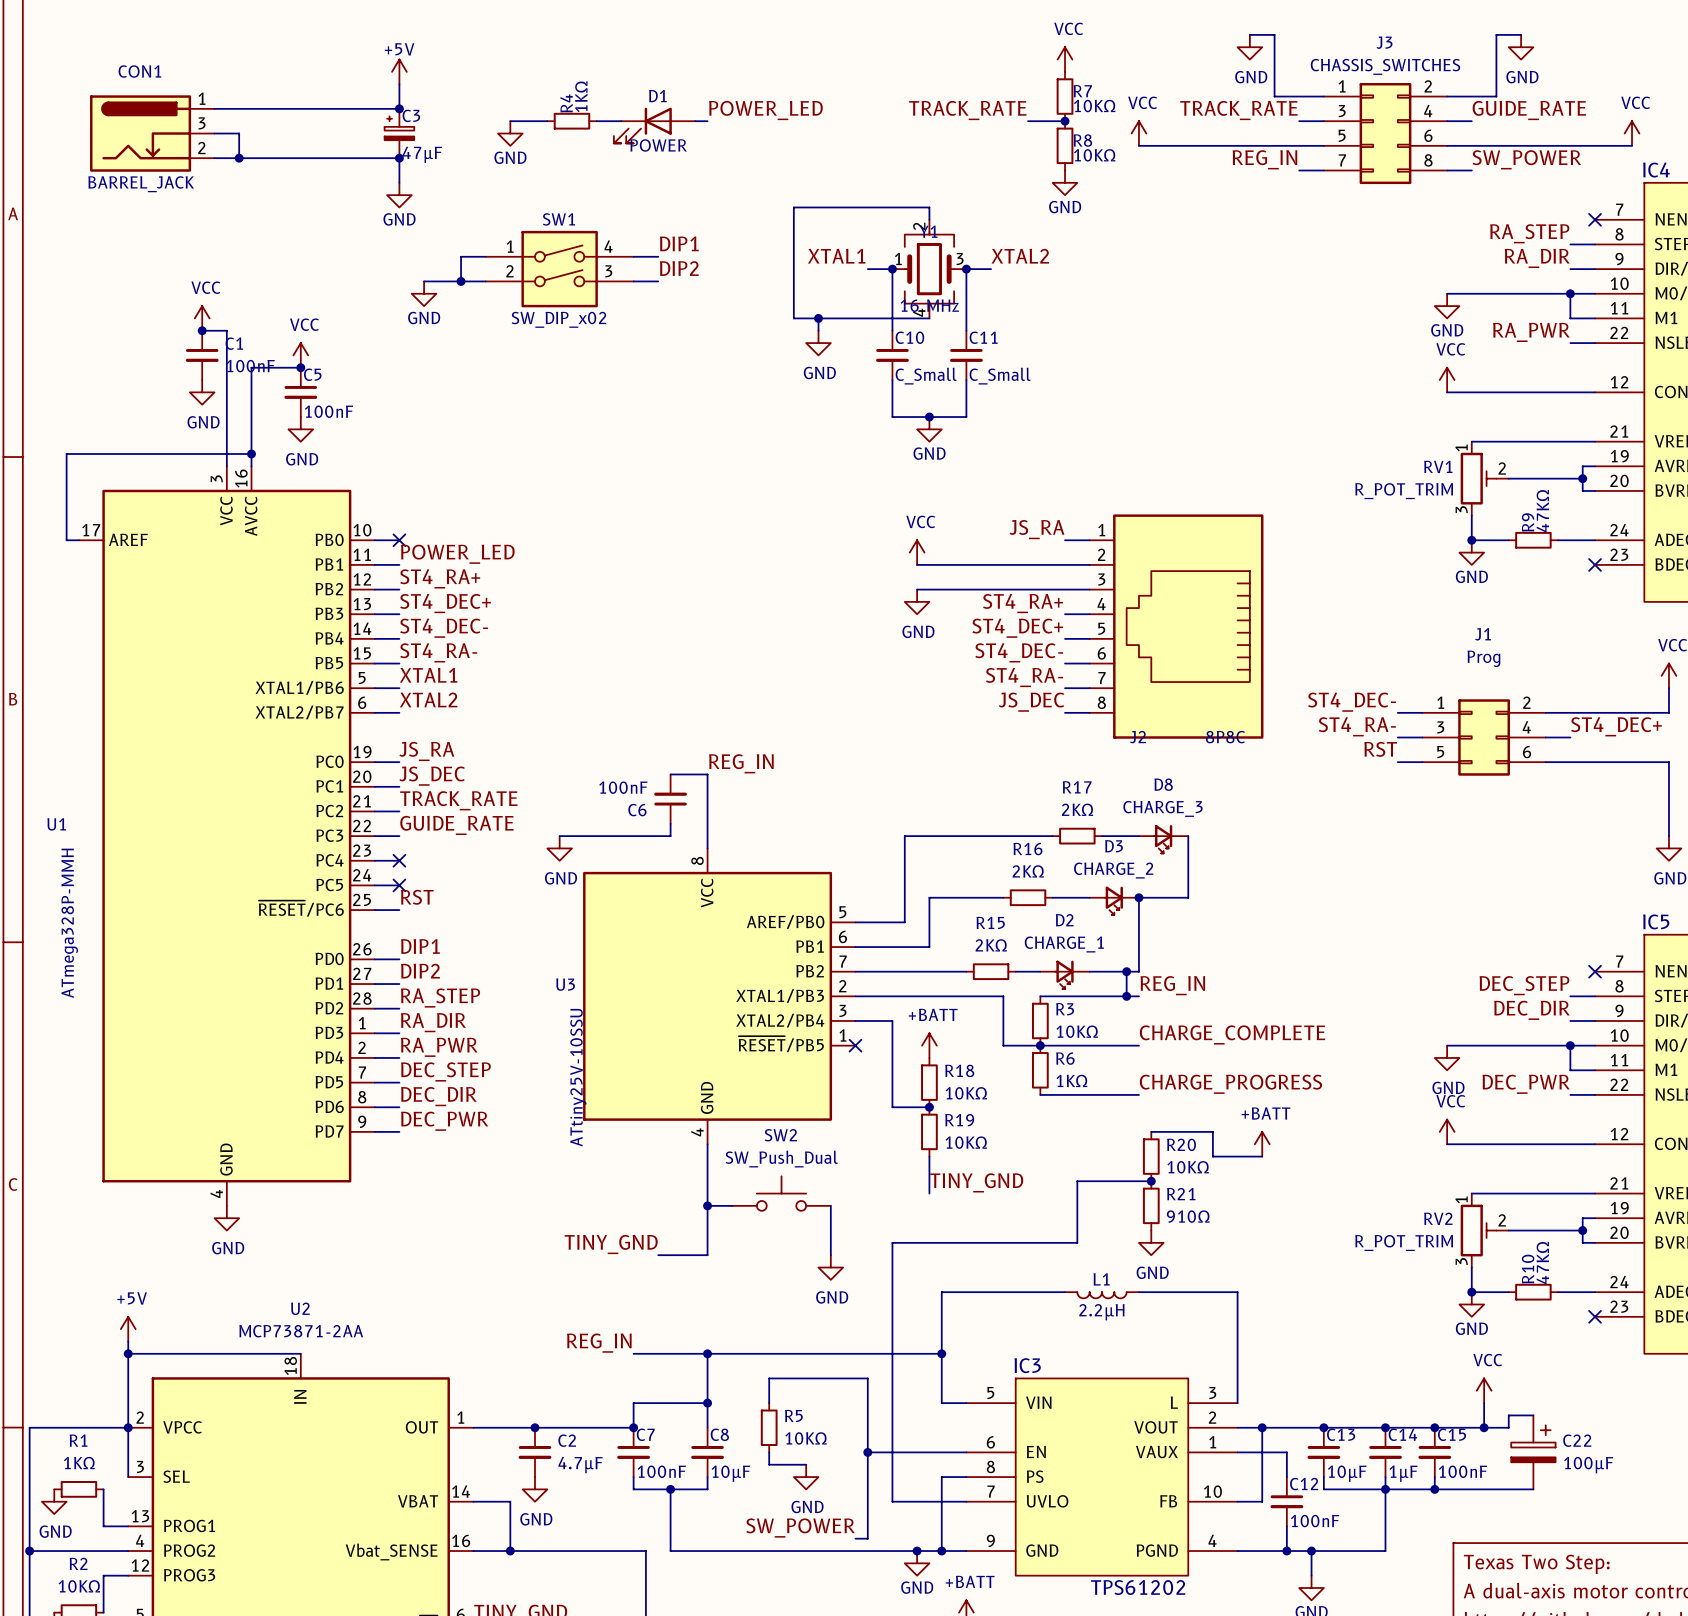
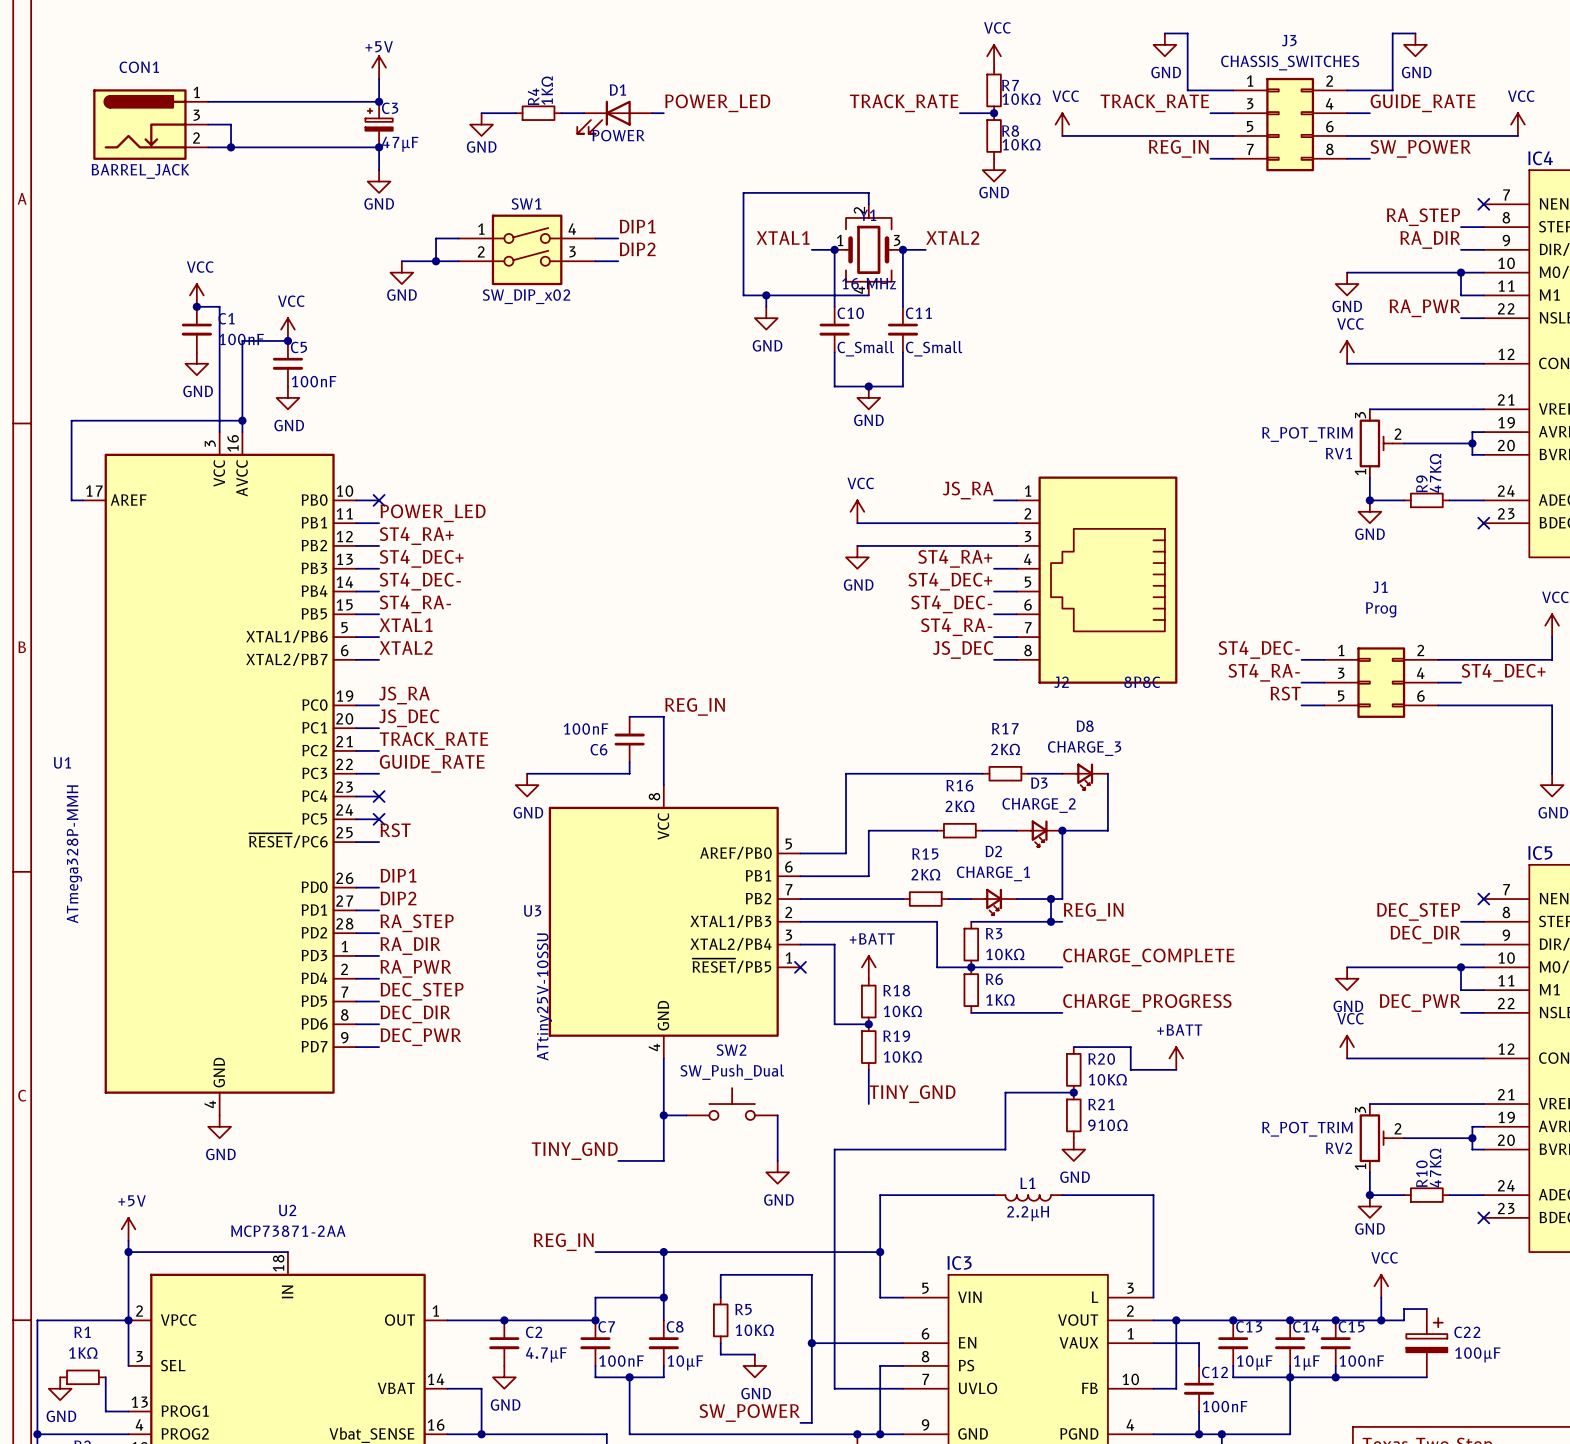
RV1 flip: as is (1478, 478) -> up-down (1376, 443)
RV2 flip: as is (1478, 1230) -> up-down (1376, 1138)

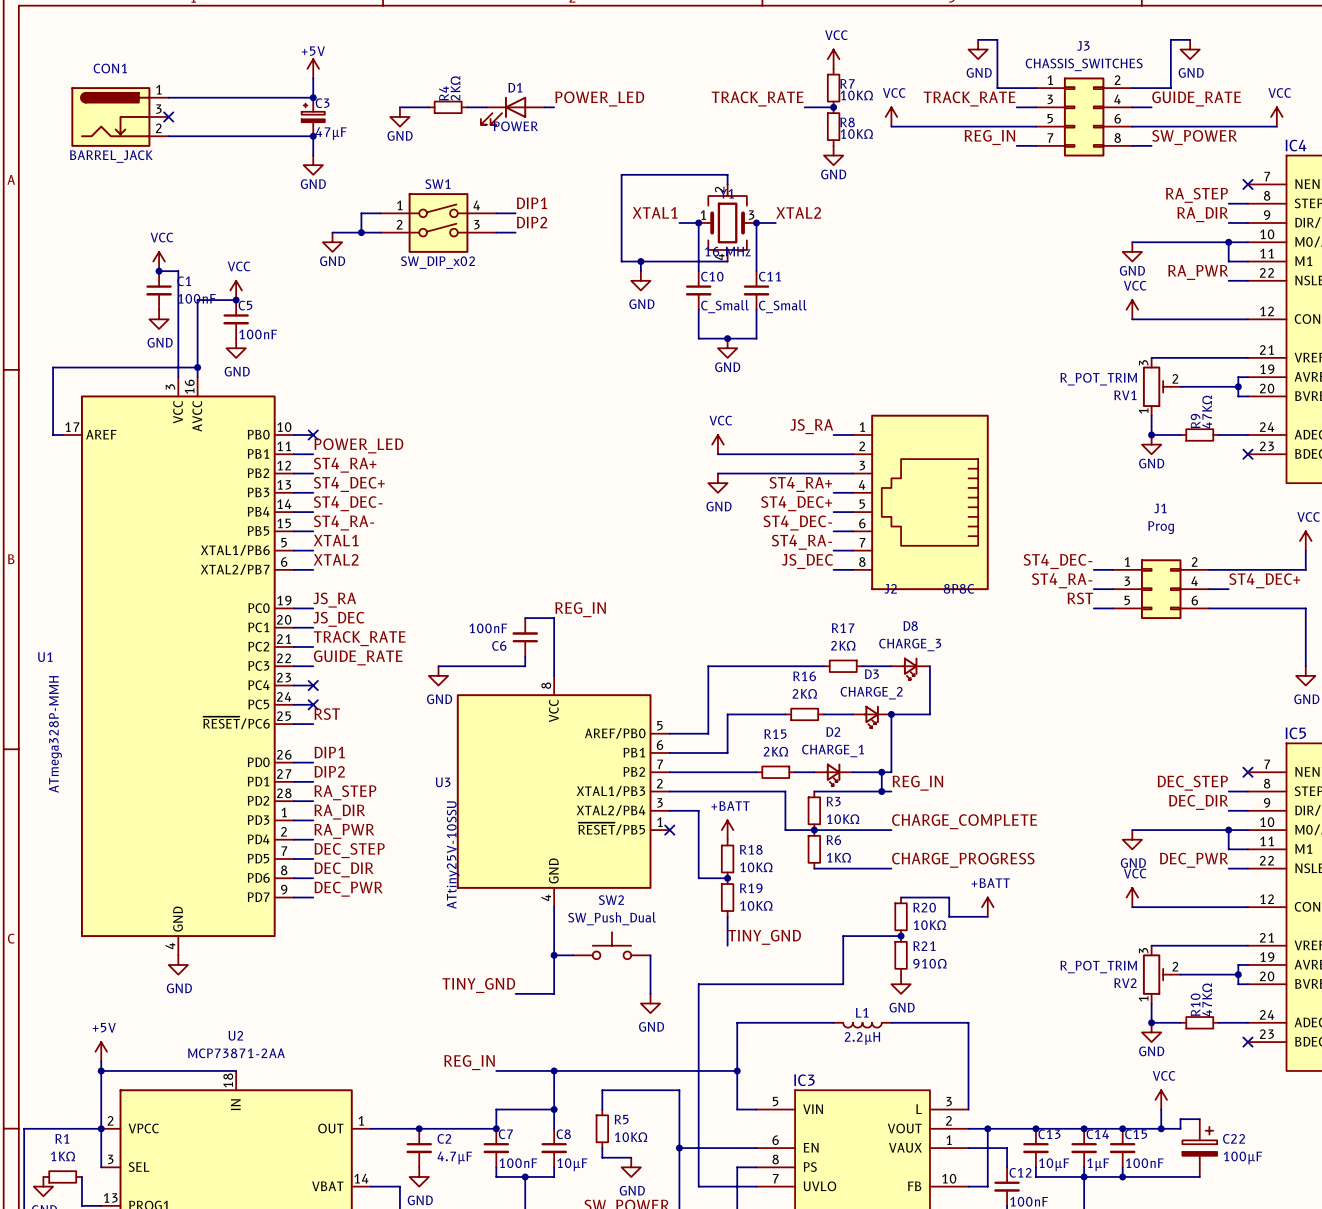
R4 value: 1KΩ (547, 90) -> 2KΩ (455, 88)
wire: (208, 124) (231, 124) (231, 147) -> none
no-connect mark: none -> (168, 116)
junction: (231, 147) -> none

